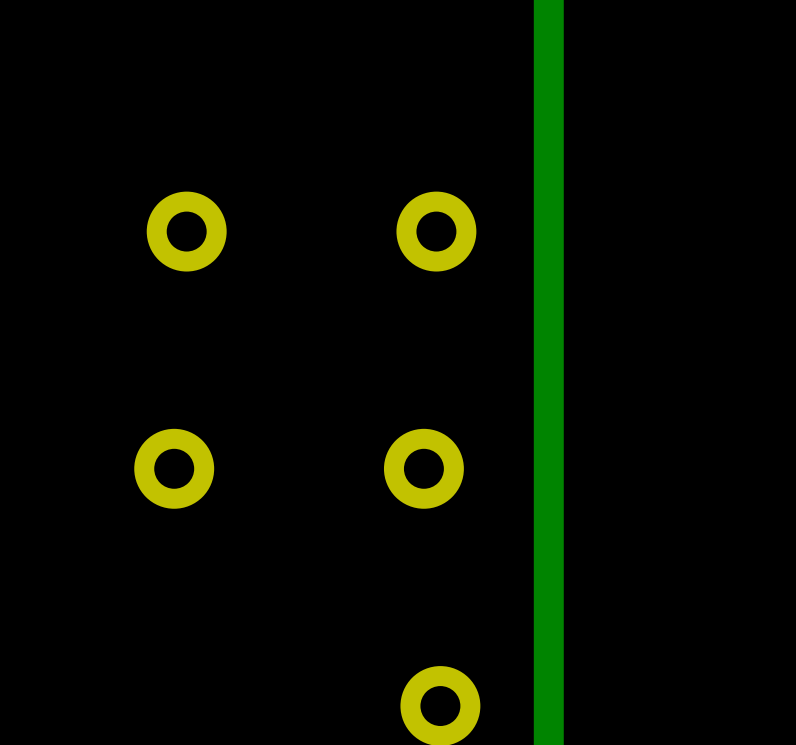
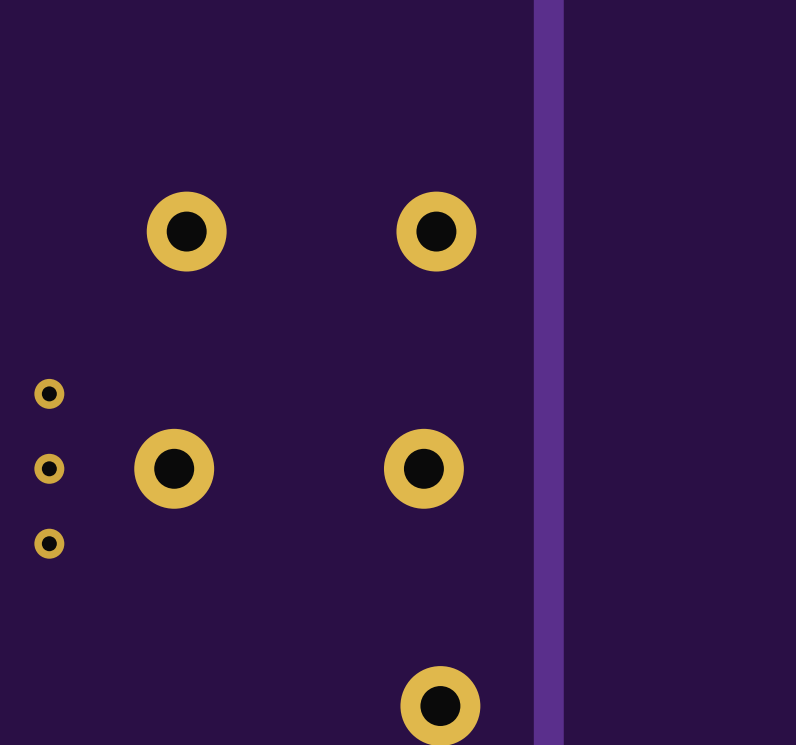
via: none -> (49, 393)
via: none -> (49, 468)
via: none -> (49, 543)

